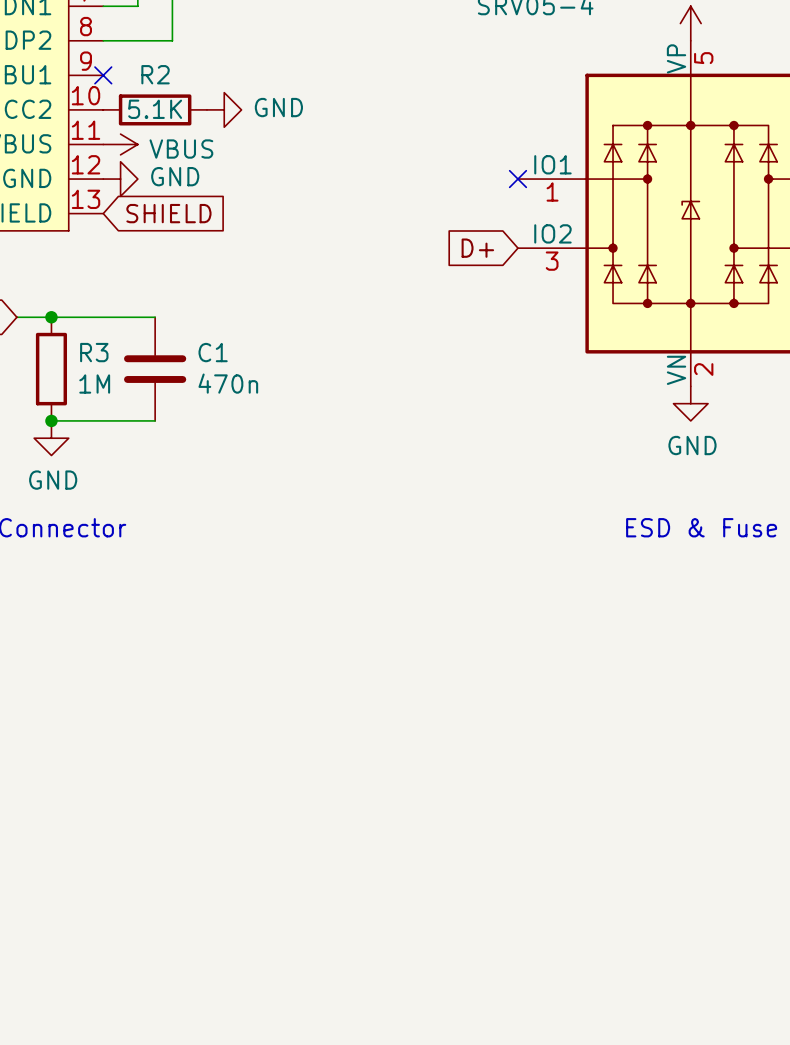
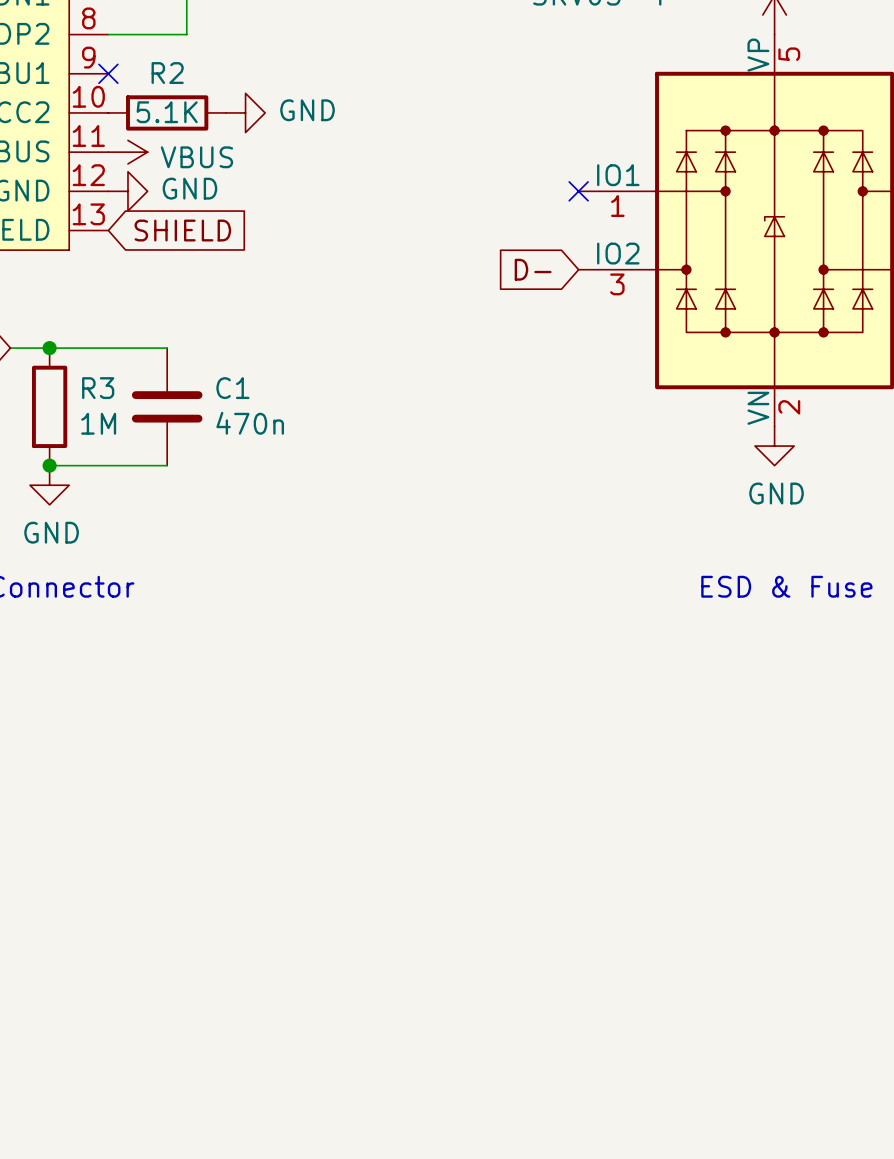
global label: D+ (477, 248) -> D- (533, 269)

